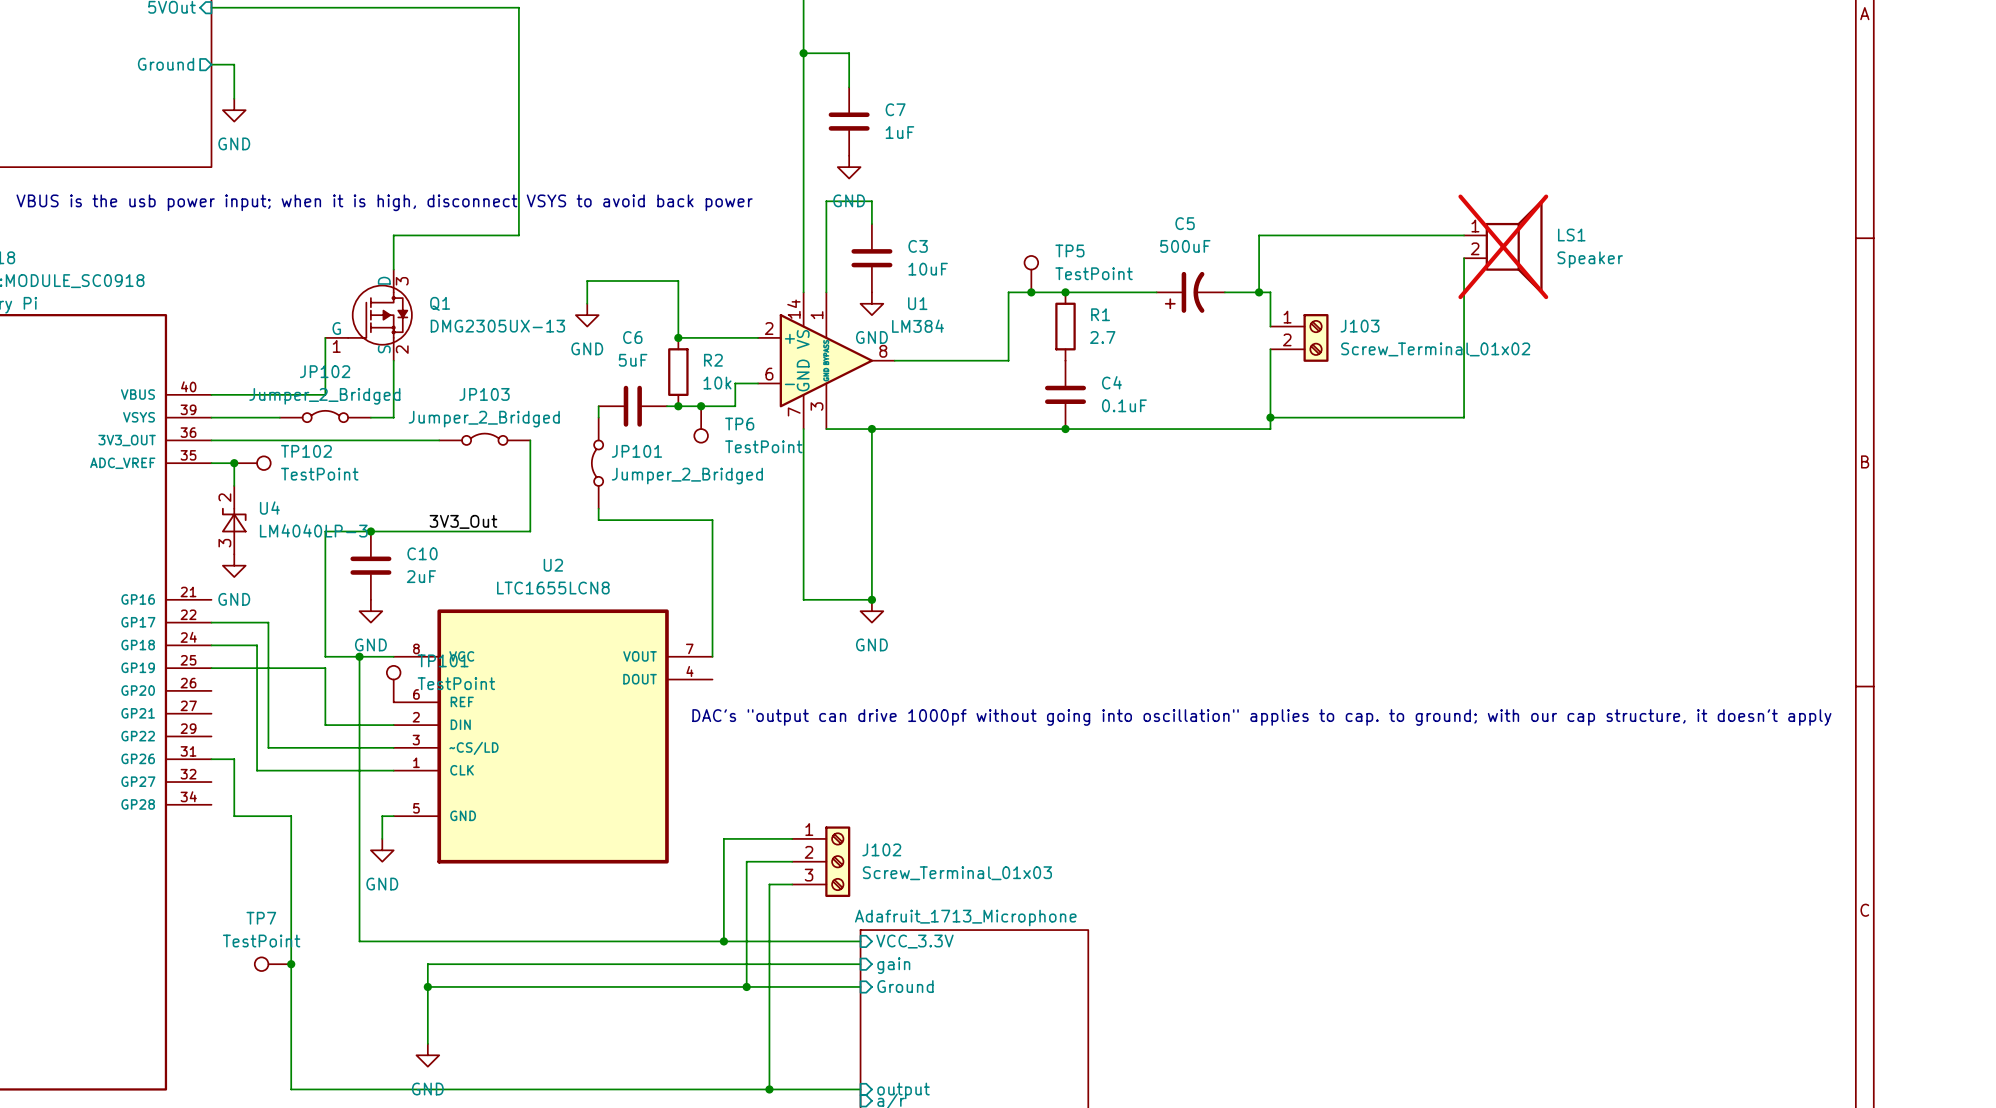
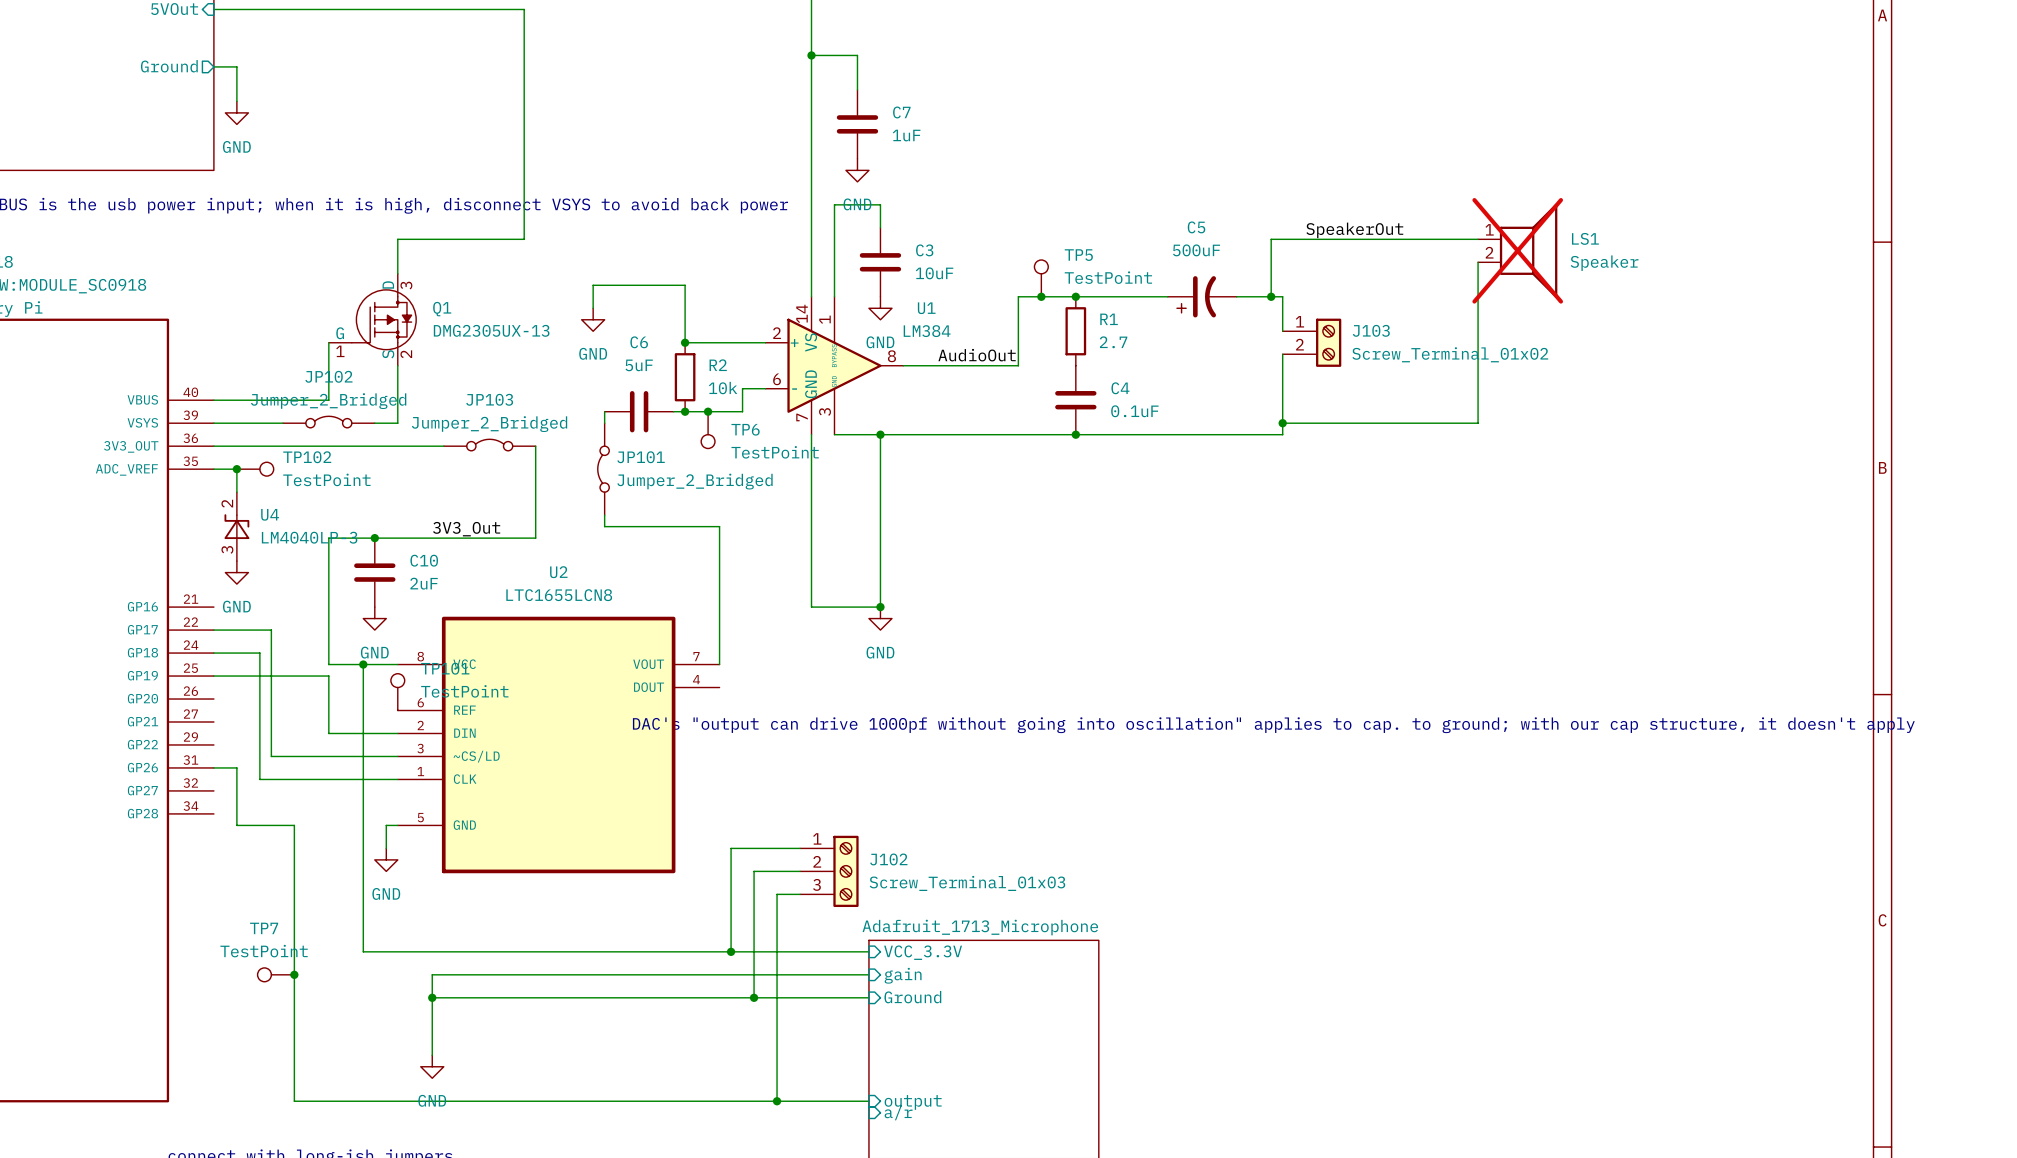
label: none -> SpeakerOut (1354, 230)
label: none -> AudioOut (977, 355)

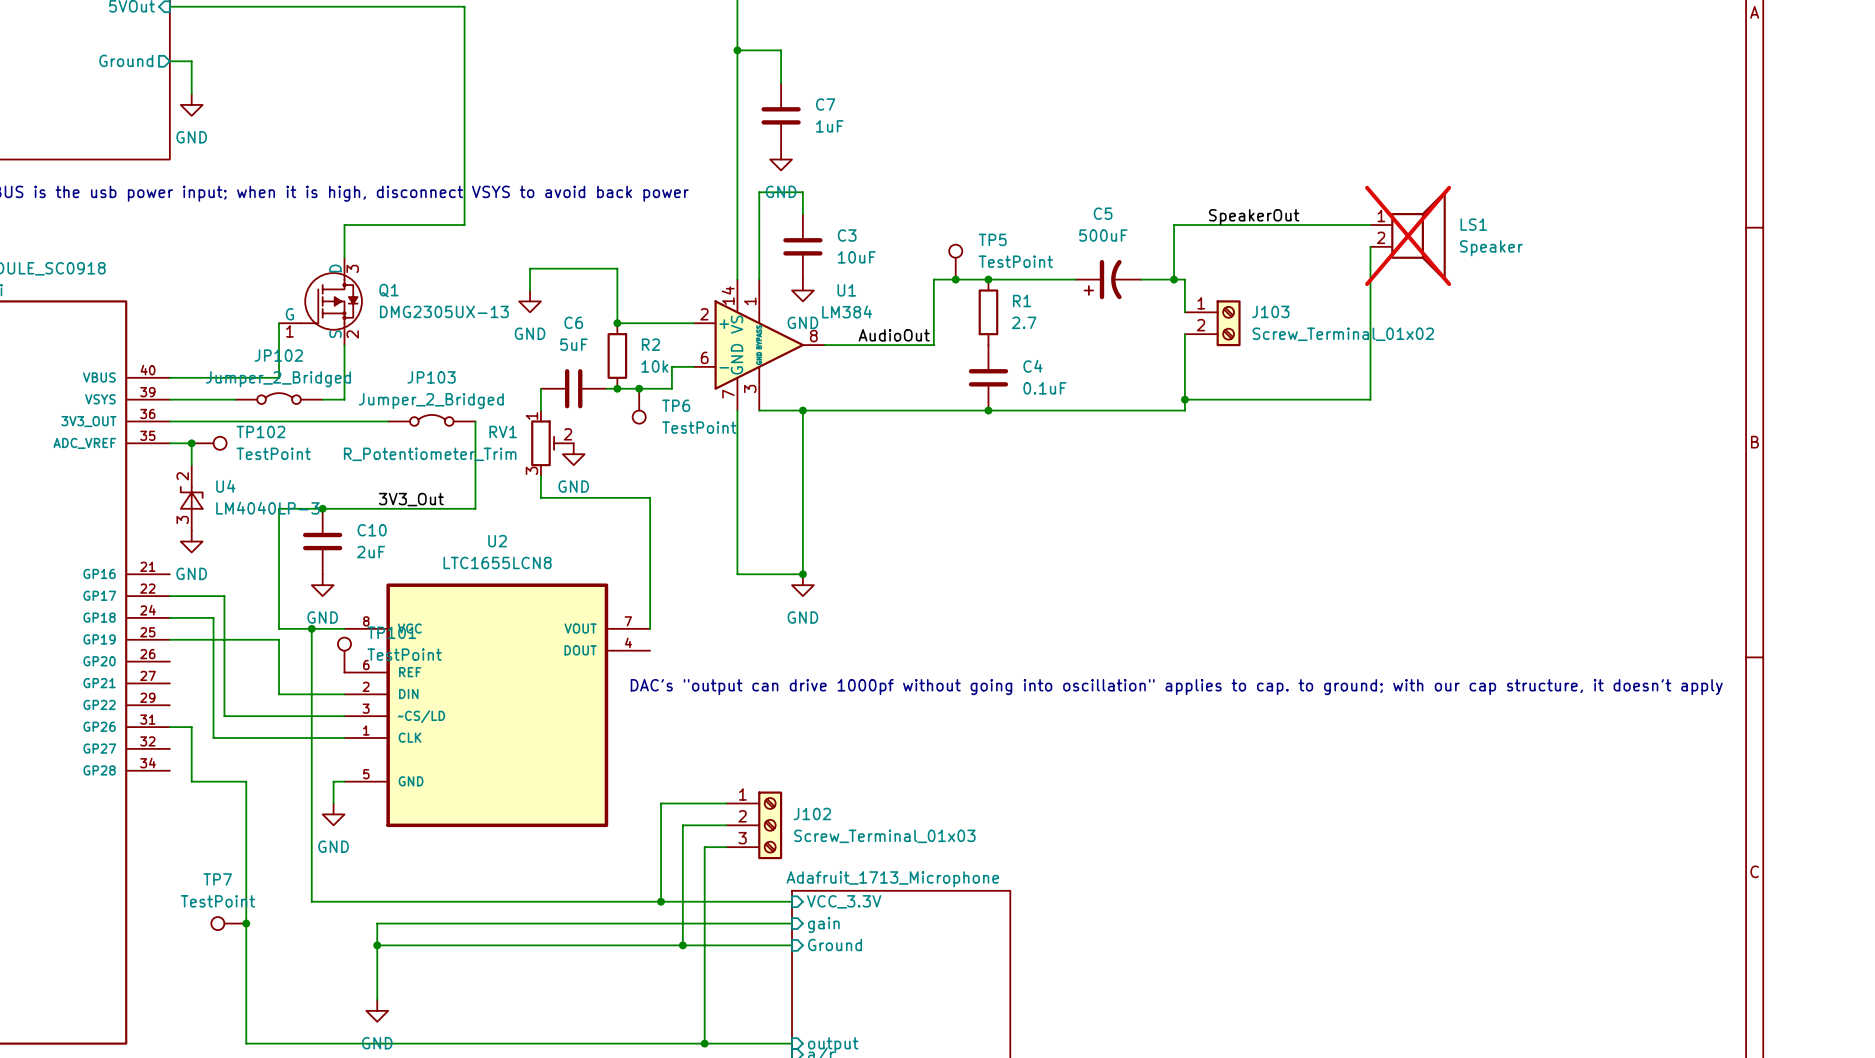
JP101: Jumper_2_Bridged (603, 469) -> none
RV1: none -> R_Potentiometer_Trim (552, 443)
power symbol: none -> GND (573, 454)

